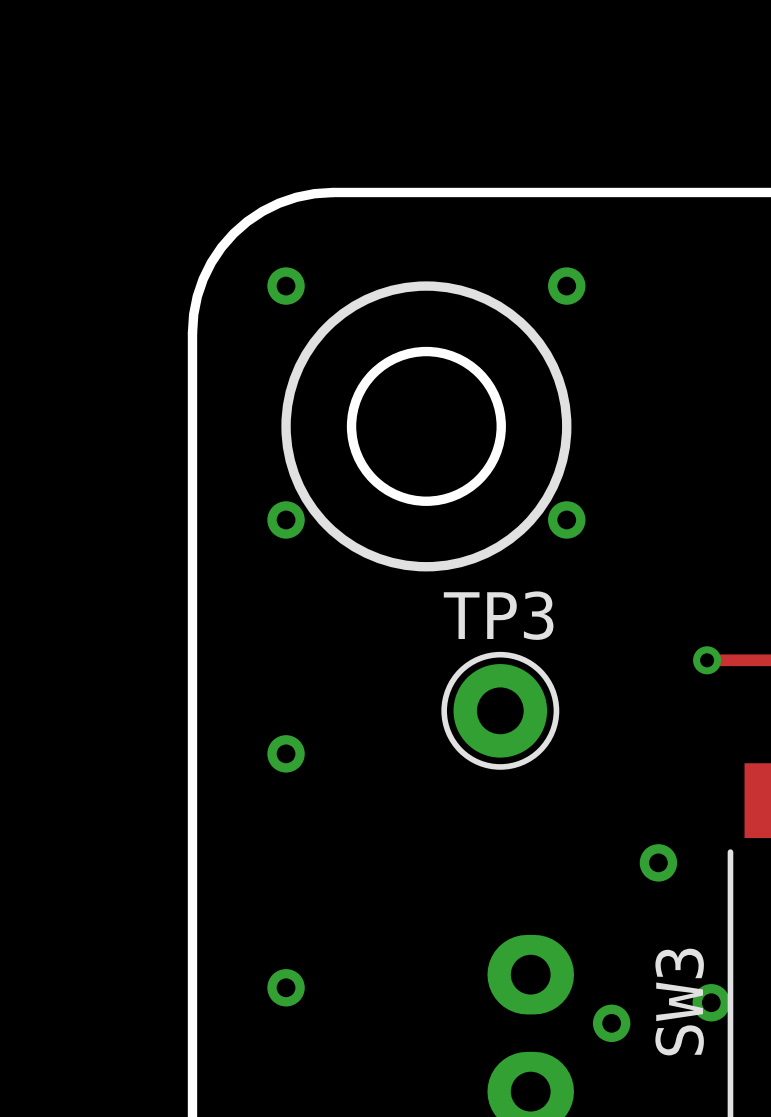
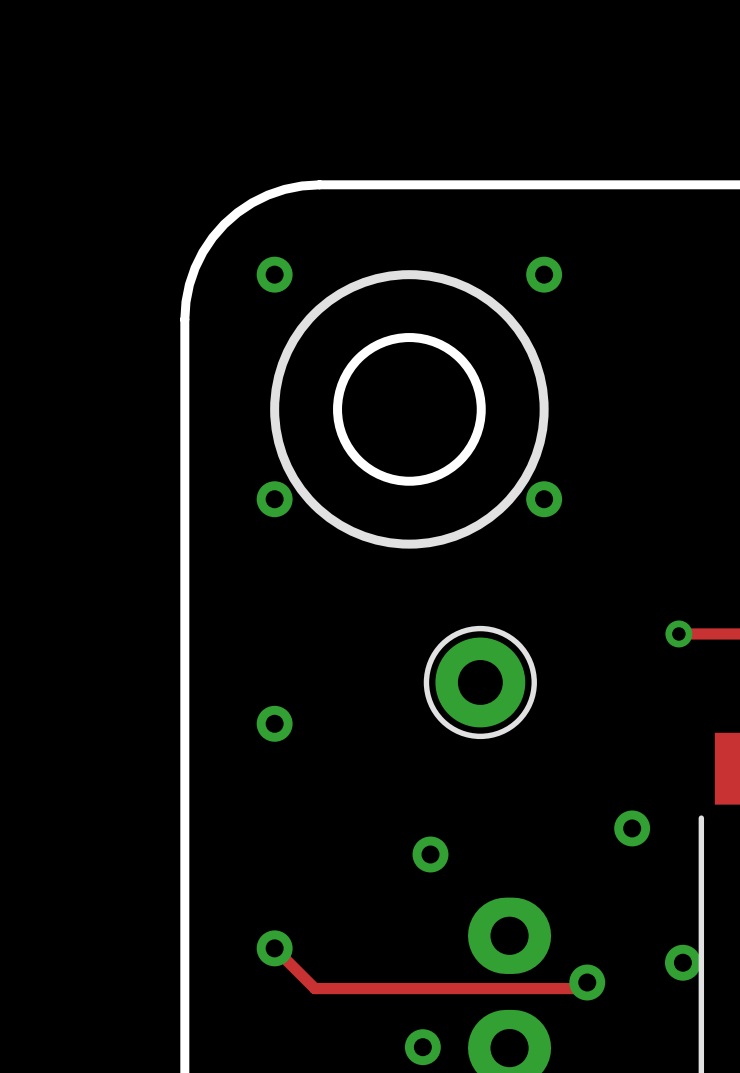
TP3 name: TP3 (498, 615) -> none
via: none -> (430, 854)
track: none -> (274, 948) (314, 988) (581, 988) (587, 982)
SW3 name: SW3 (679, 1002) -> none
via: none -> (422, 1047)

